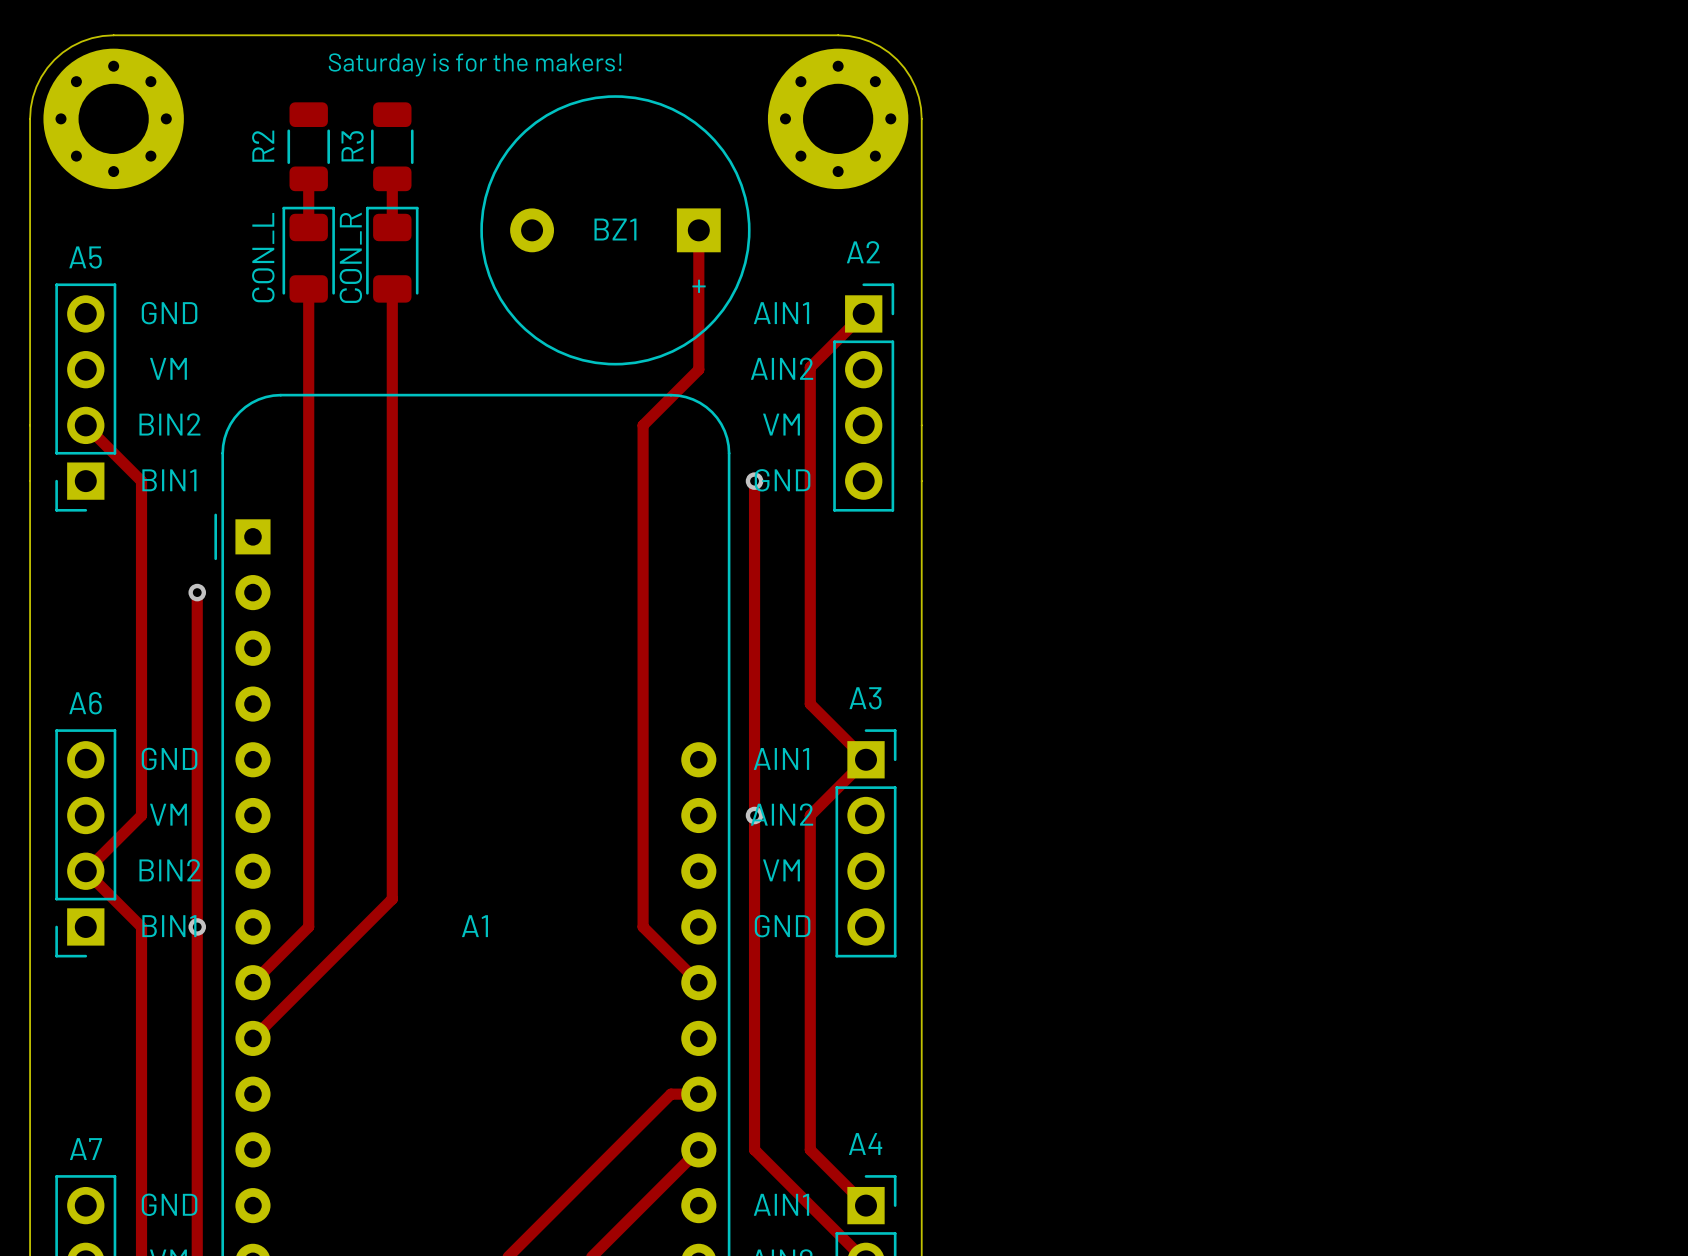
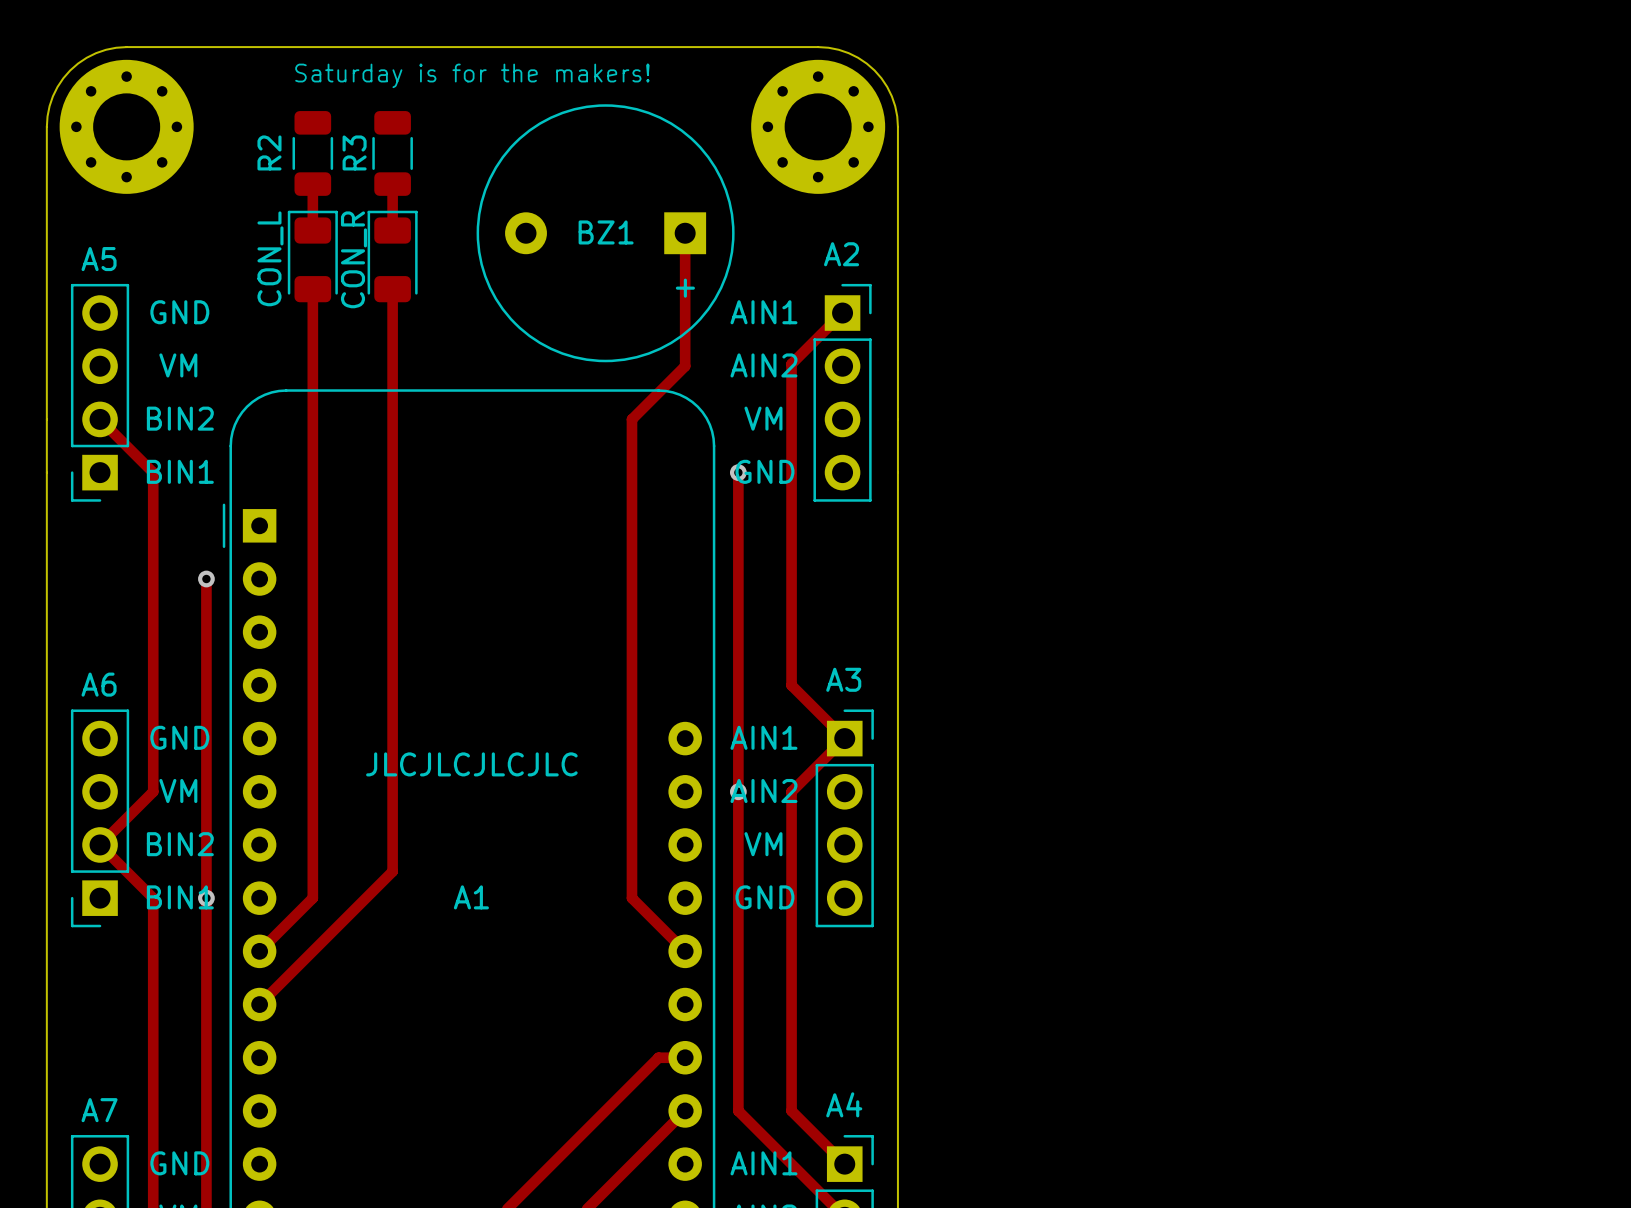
text: none -> JLCJLCJLCJLC (471, 764)

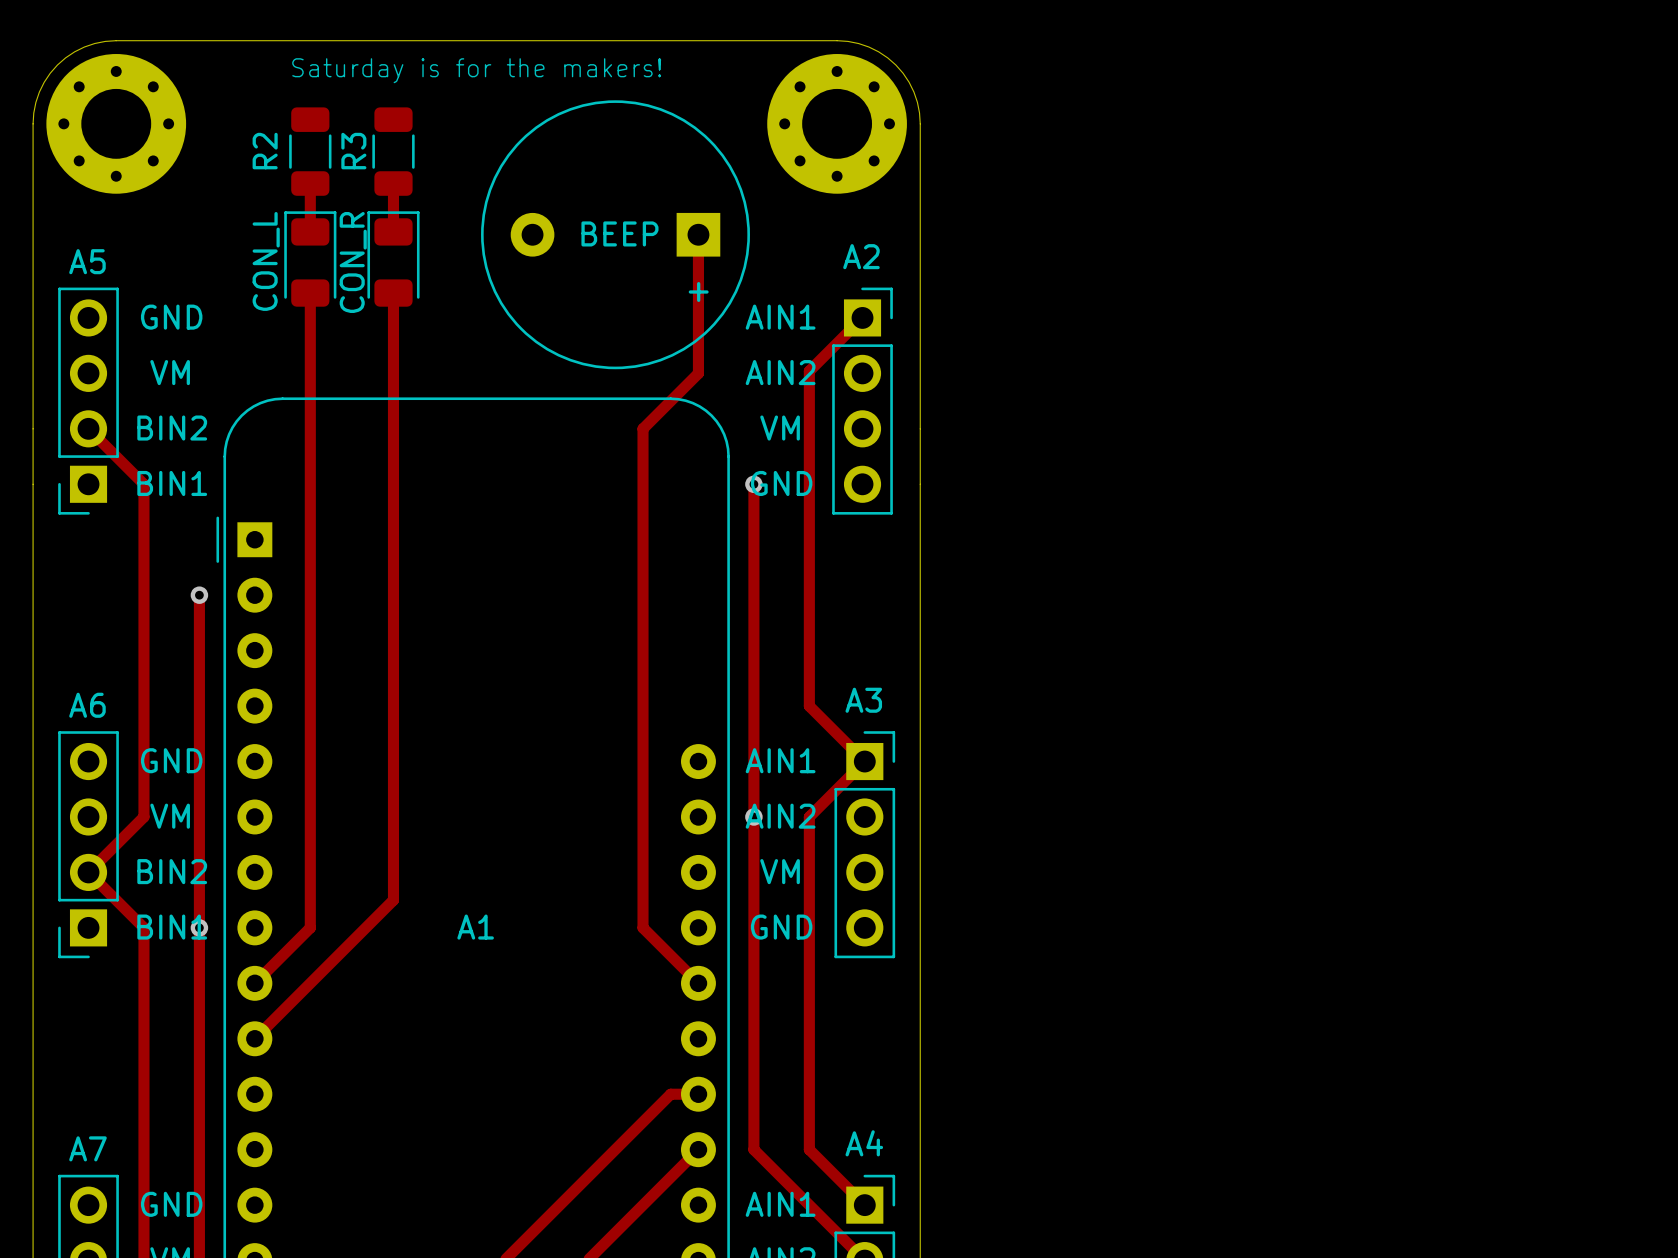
BZ1 name: BZ1 (606, 232) -> none
text: none -> BEEP (619, 233)
text: JLCJLCJLCJLC (471, 764) -> none

